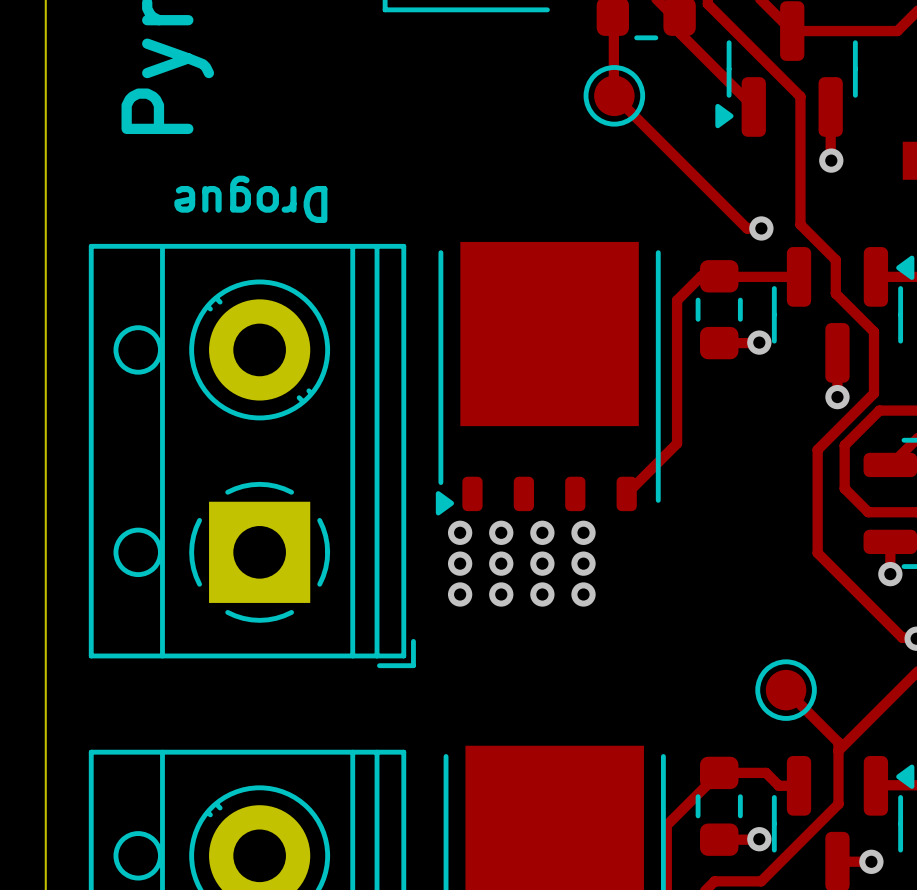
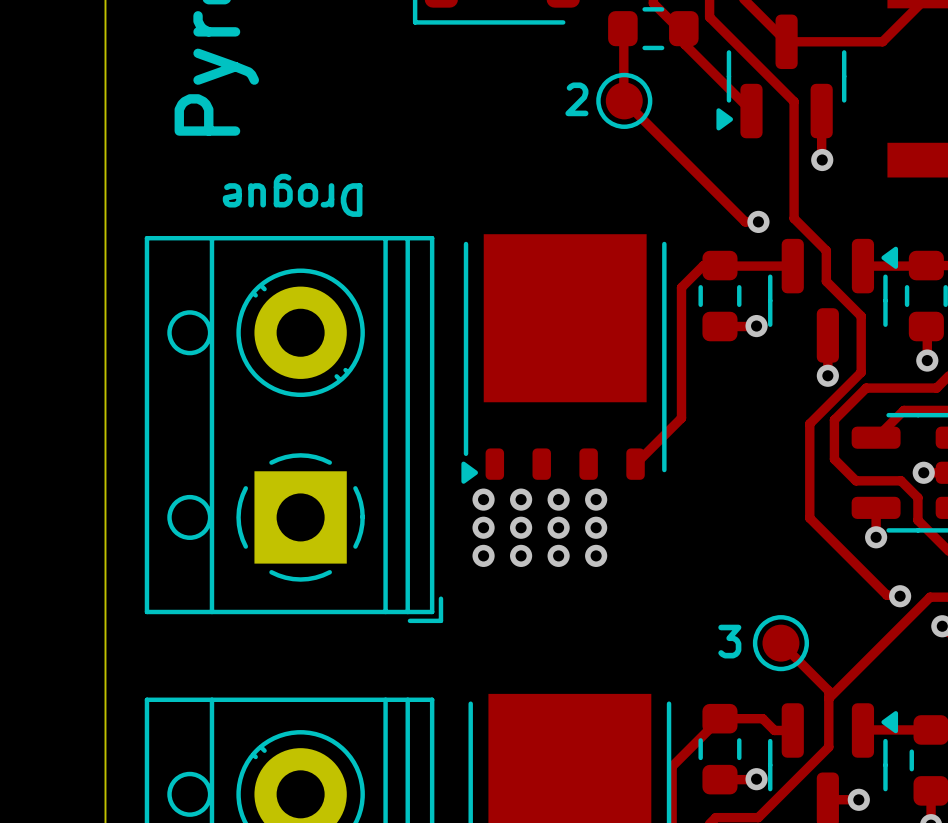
text: none -> 2 (576, 99)
text: none -> 3 (729, 641)

